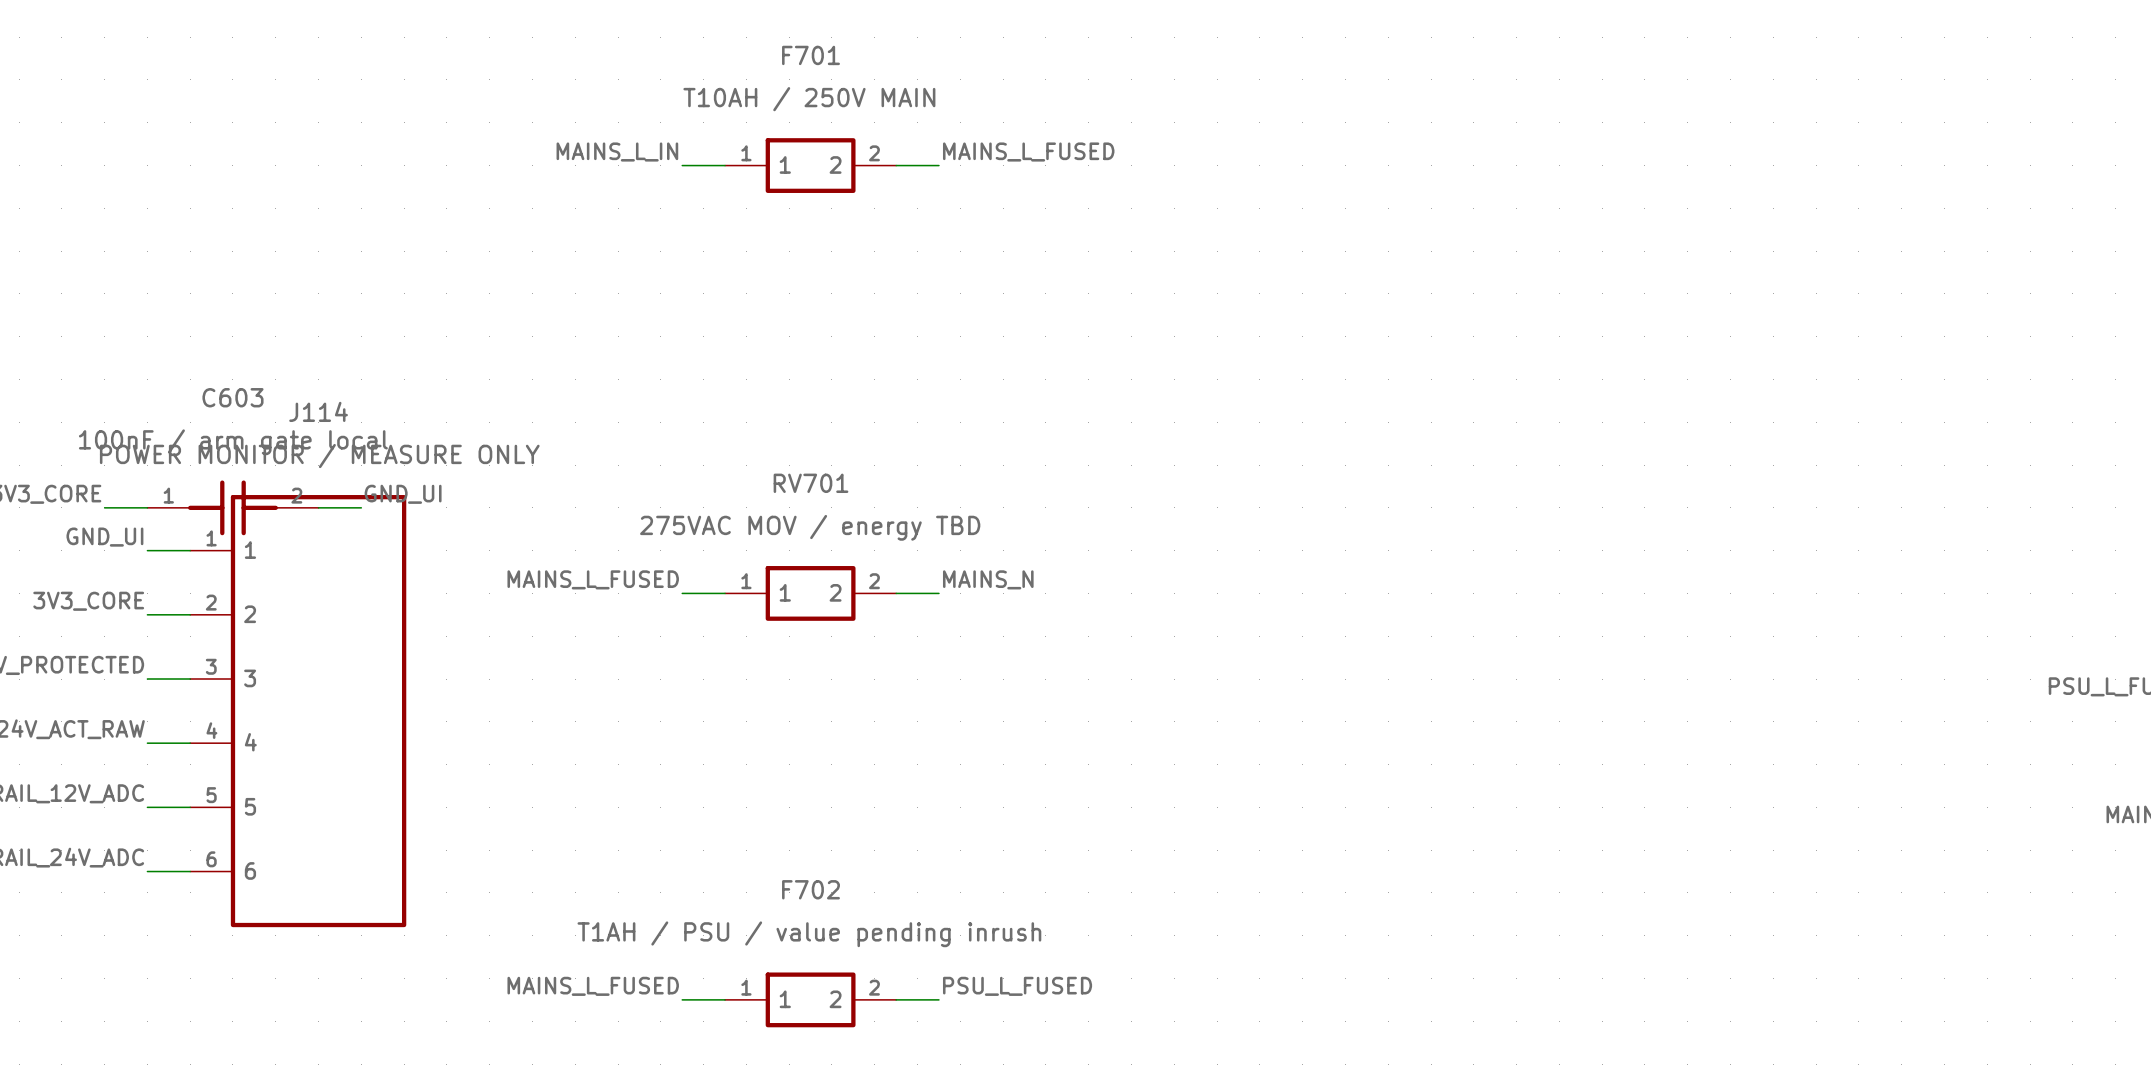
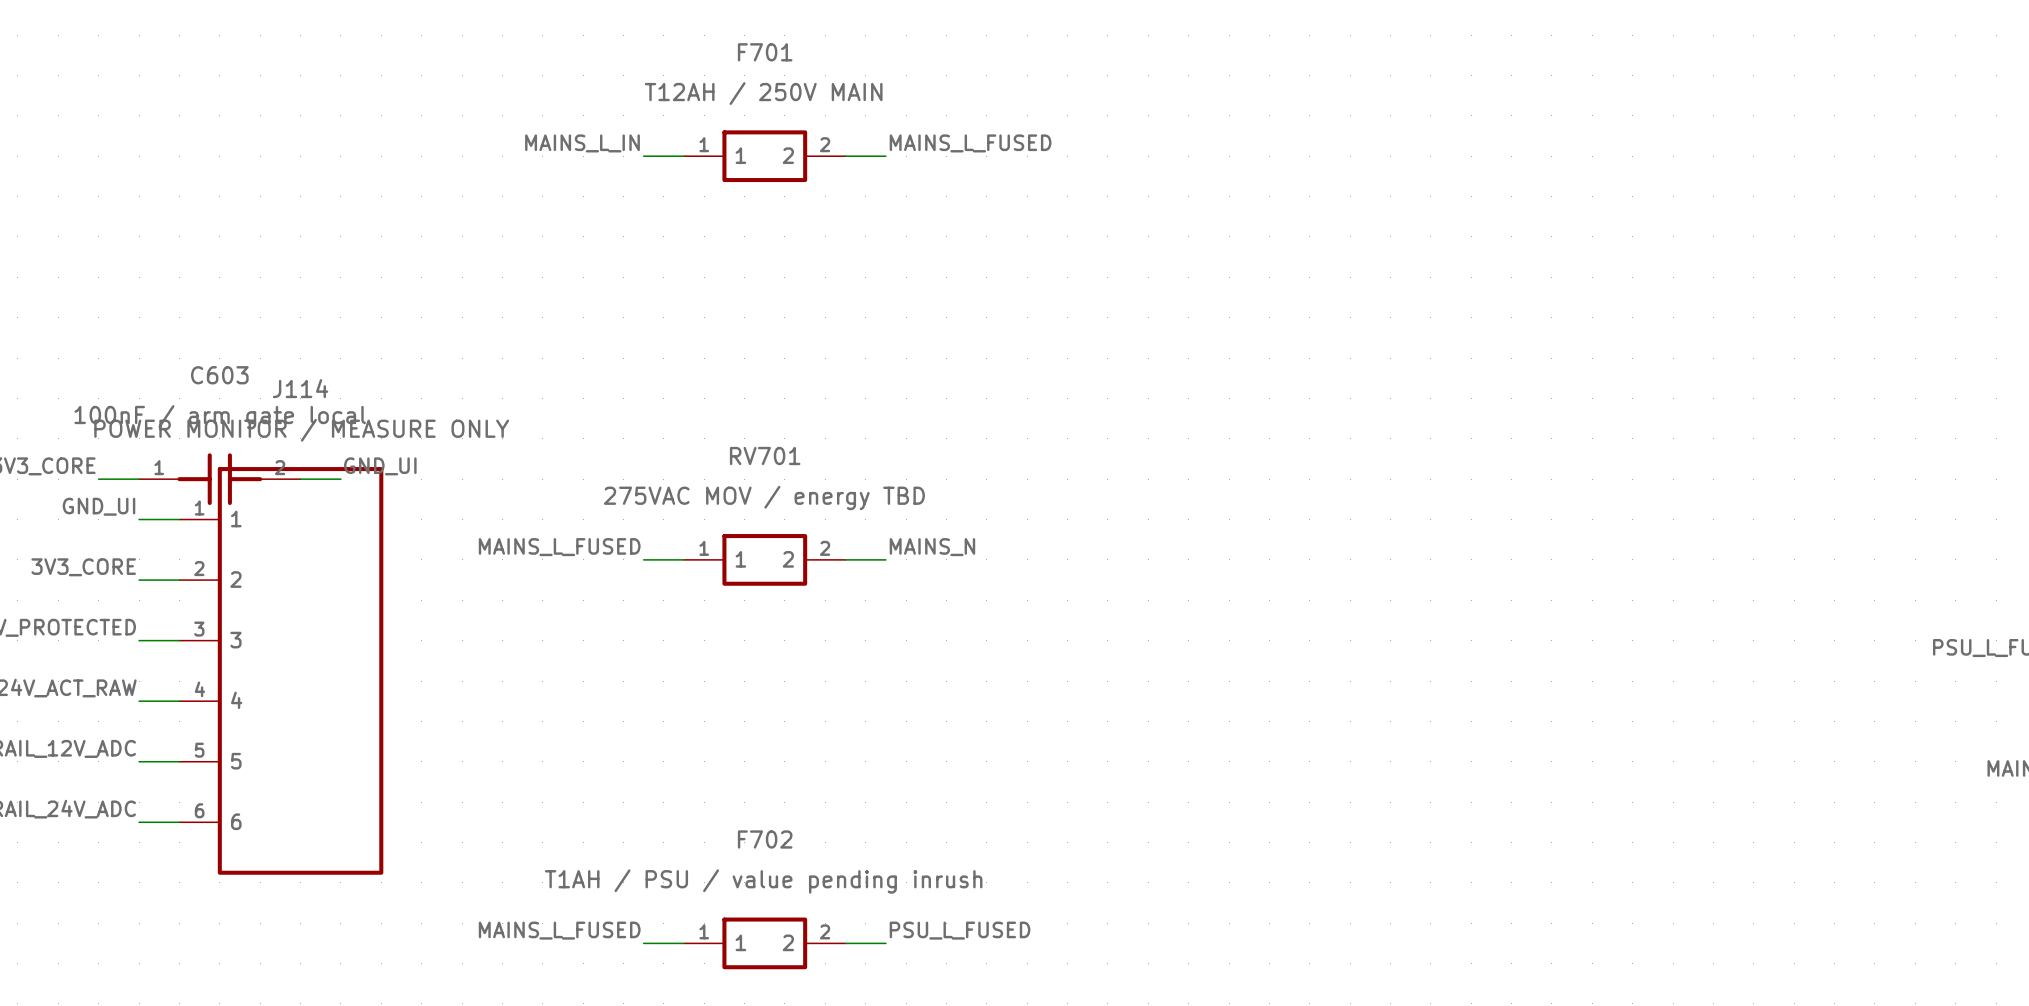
F701 value: T10AH / 250V MAIN (809, 99) -> T12AH / 250V MAIN (763, 93)

